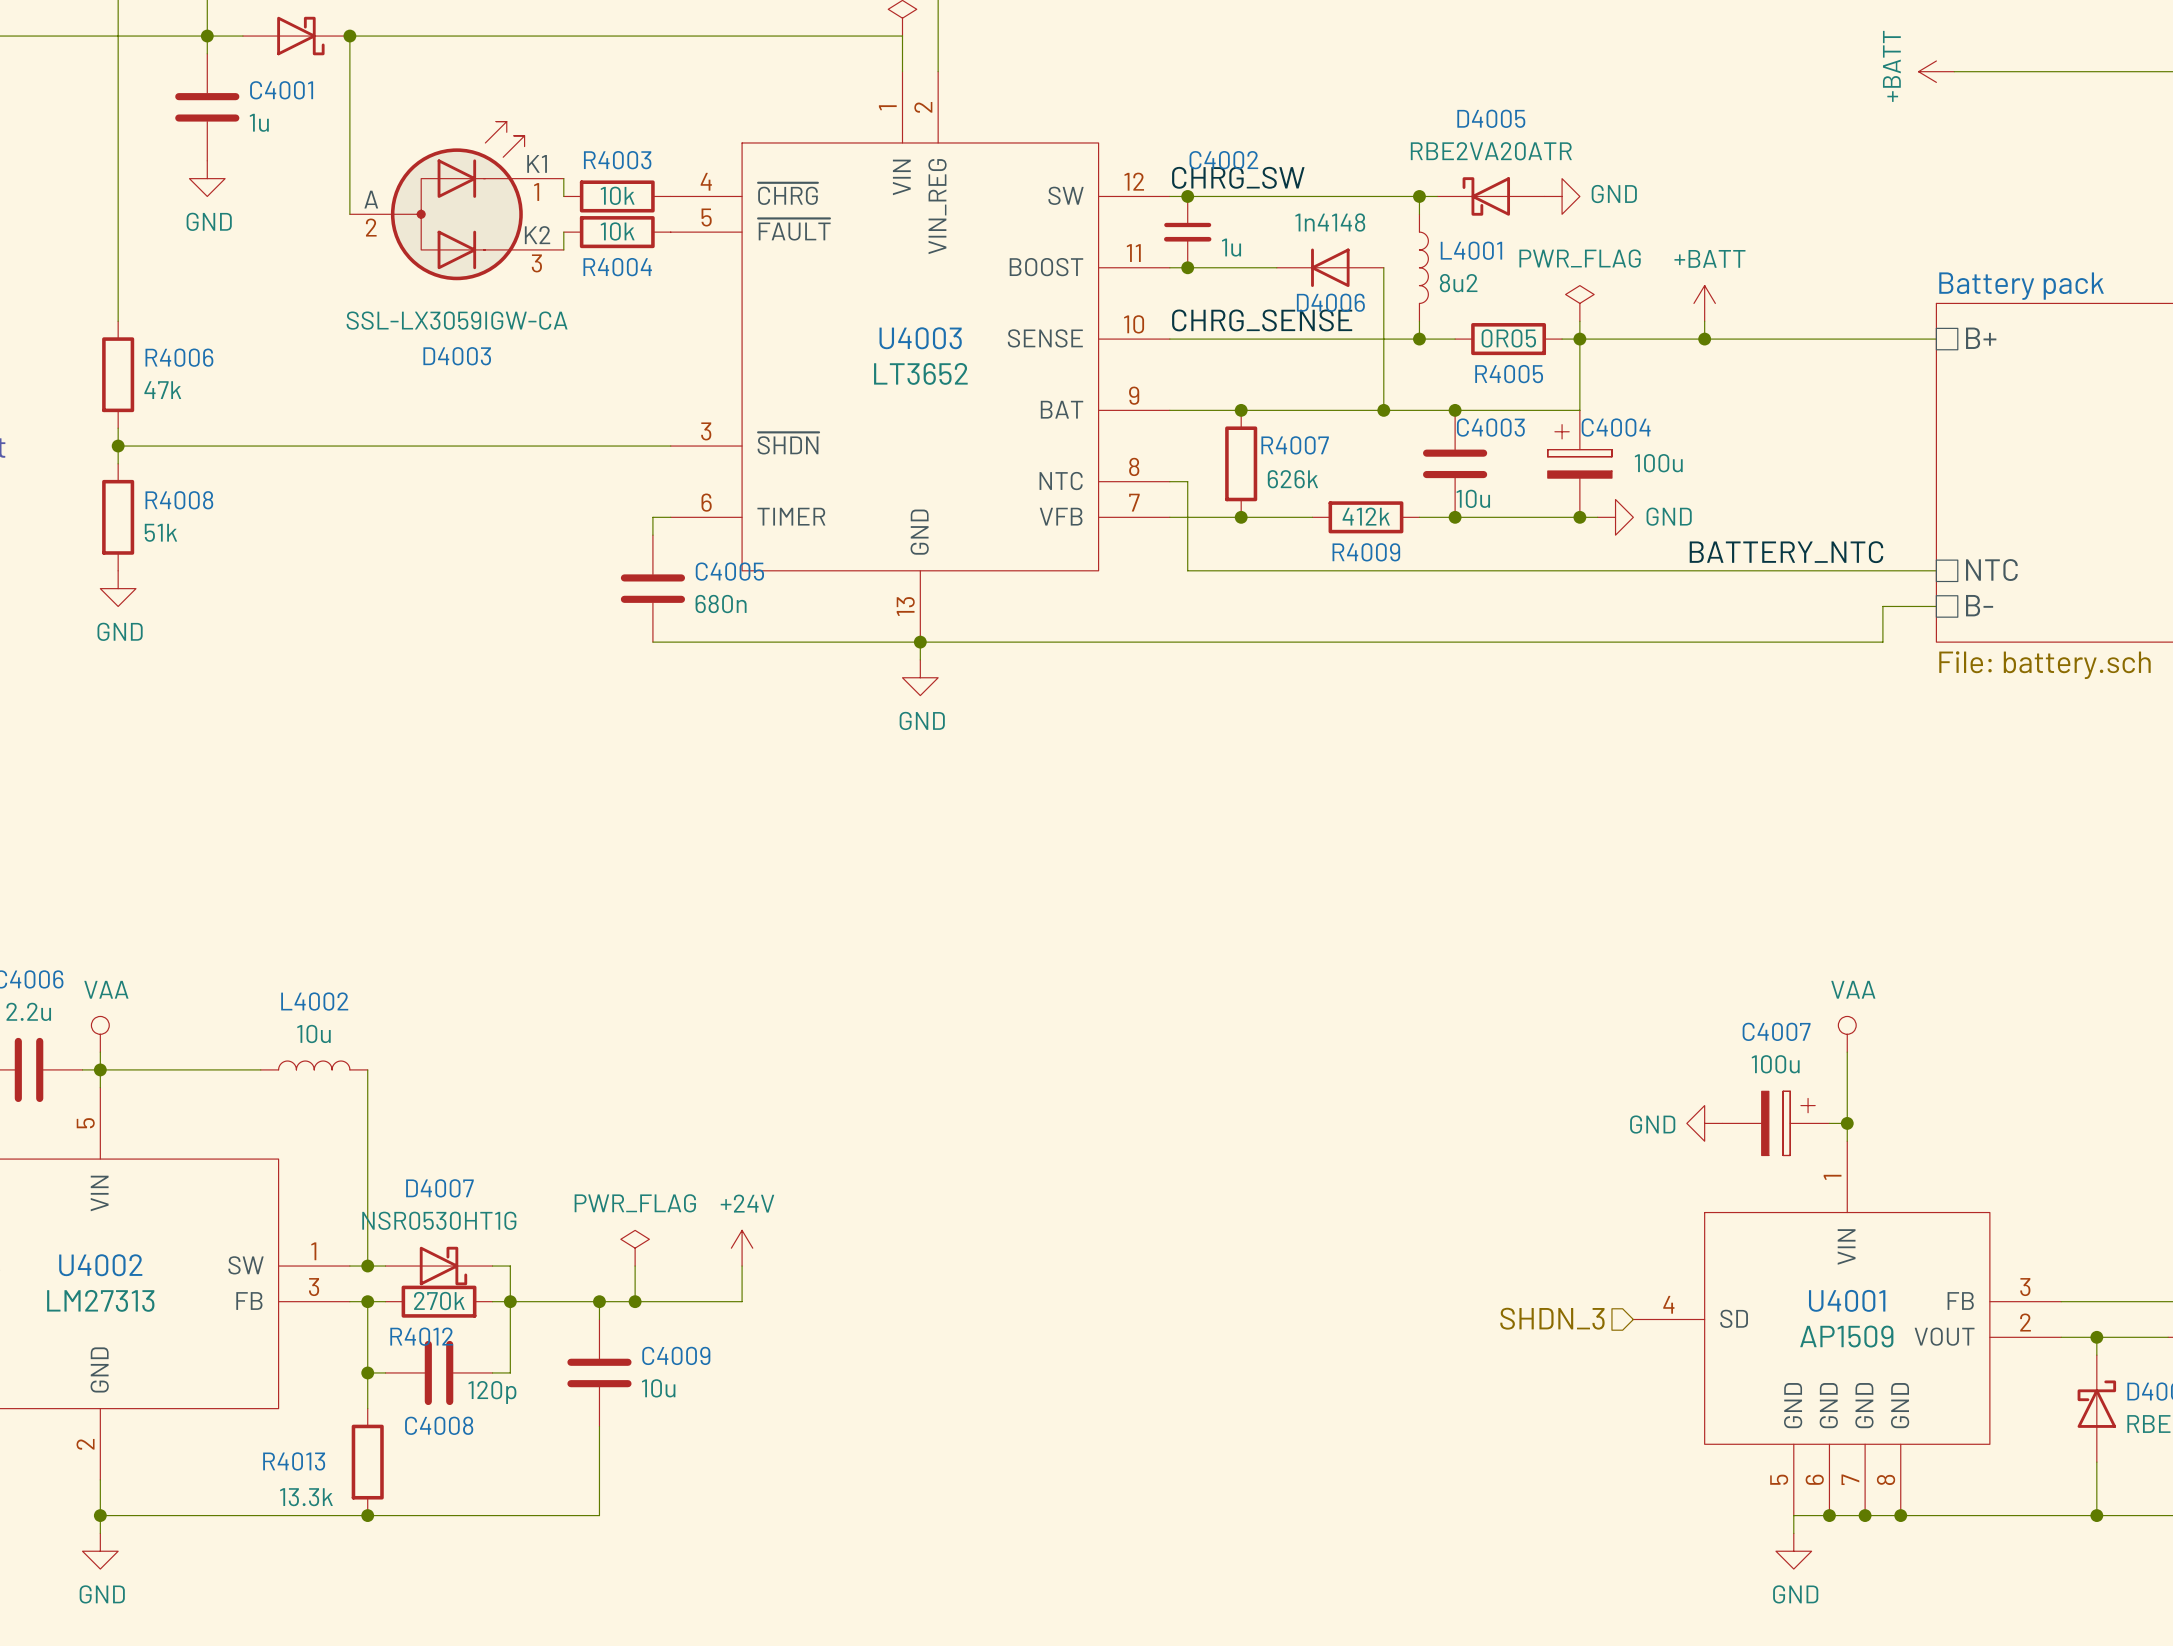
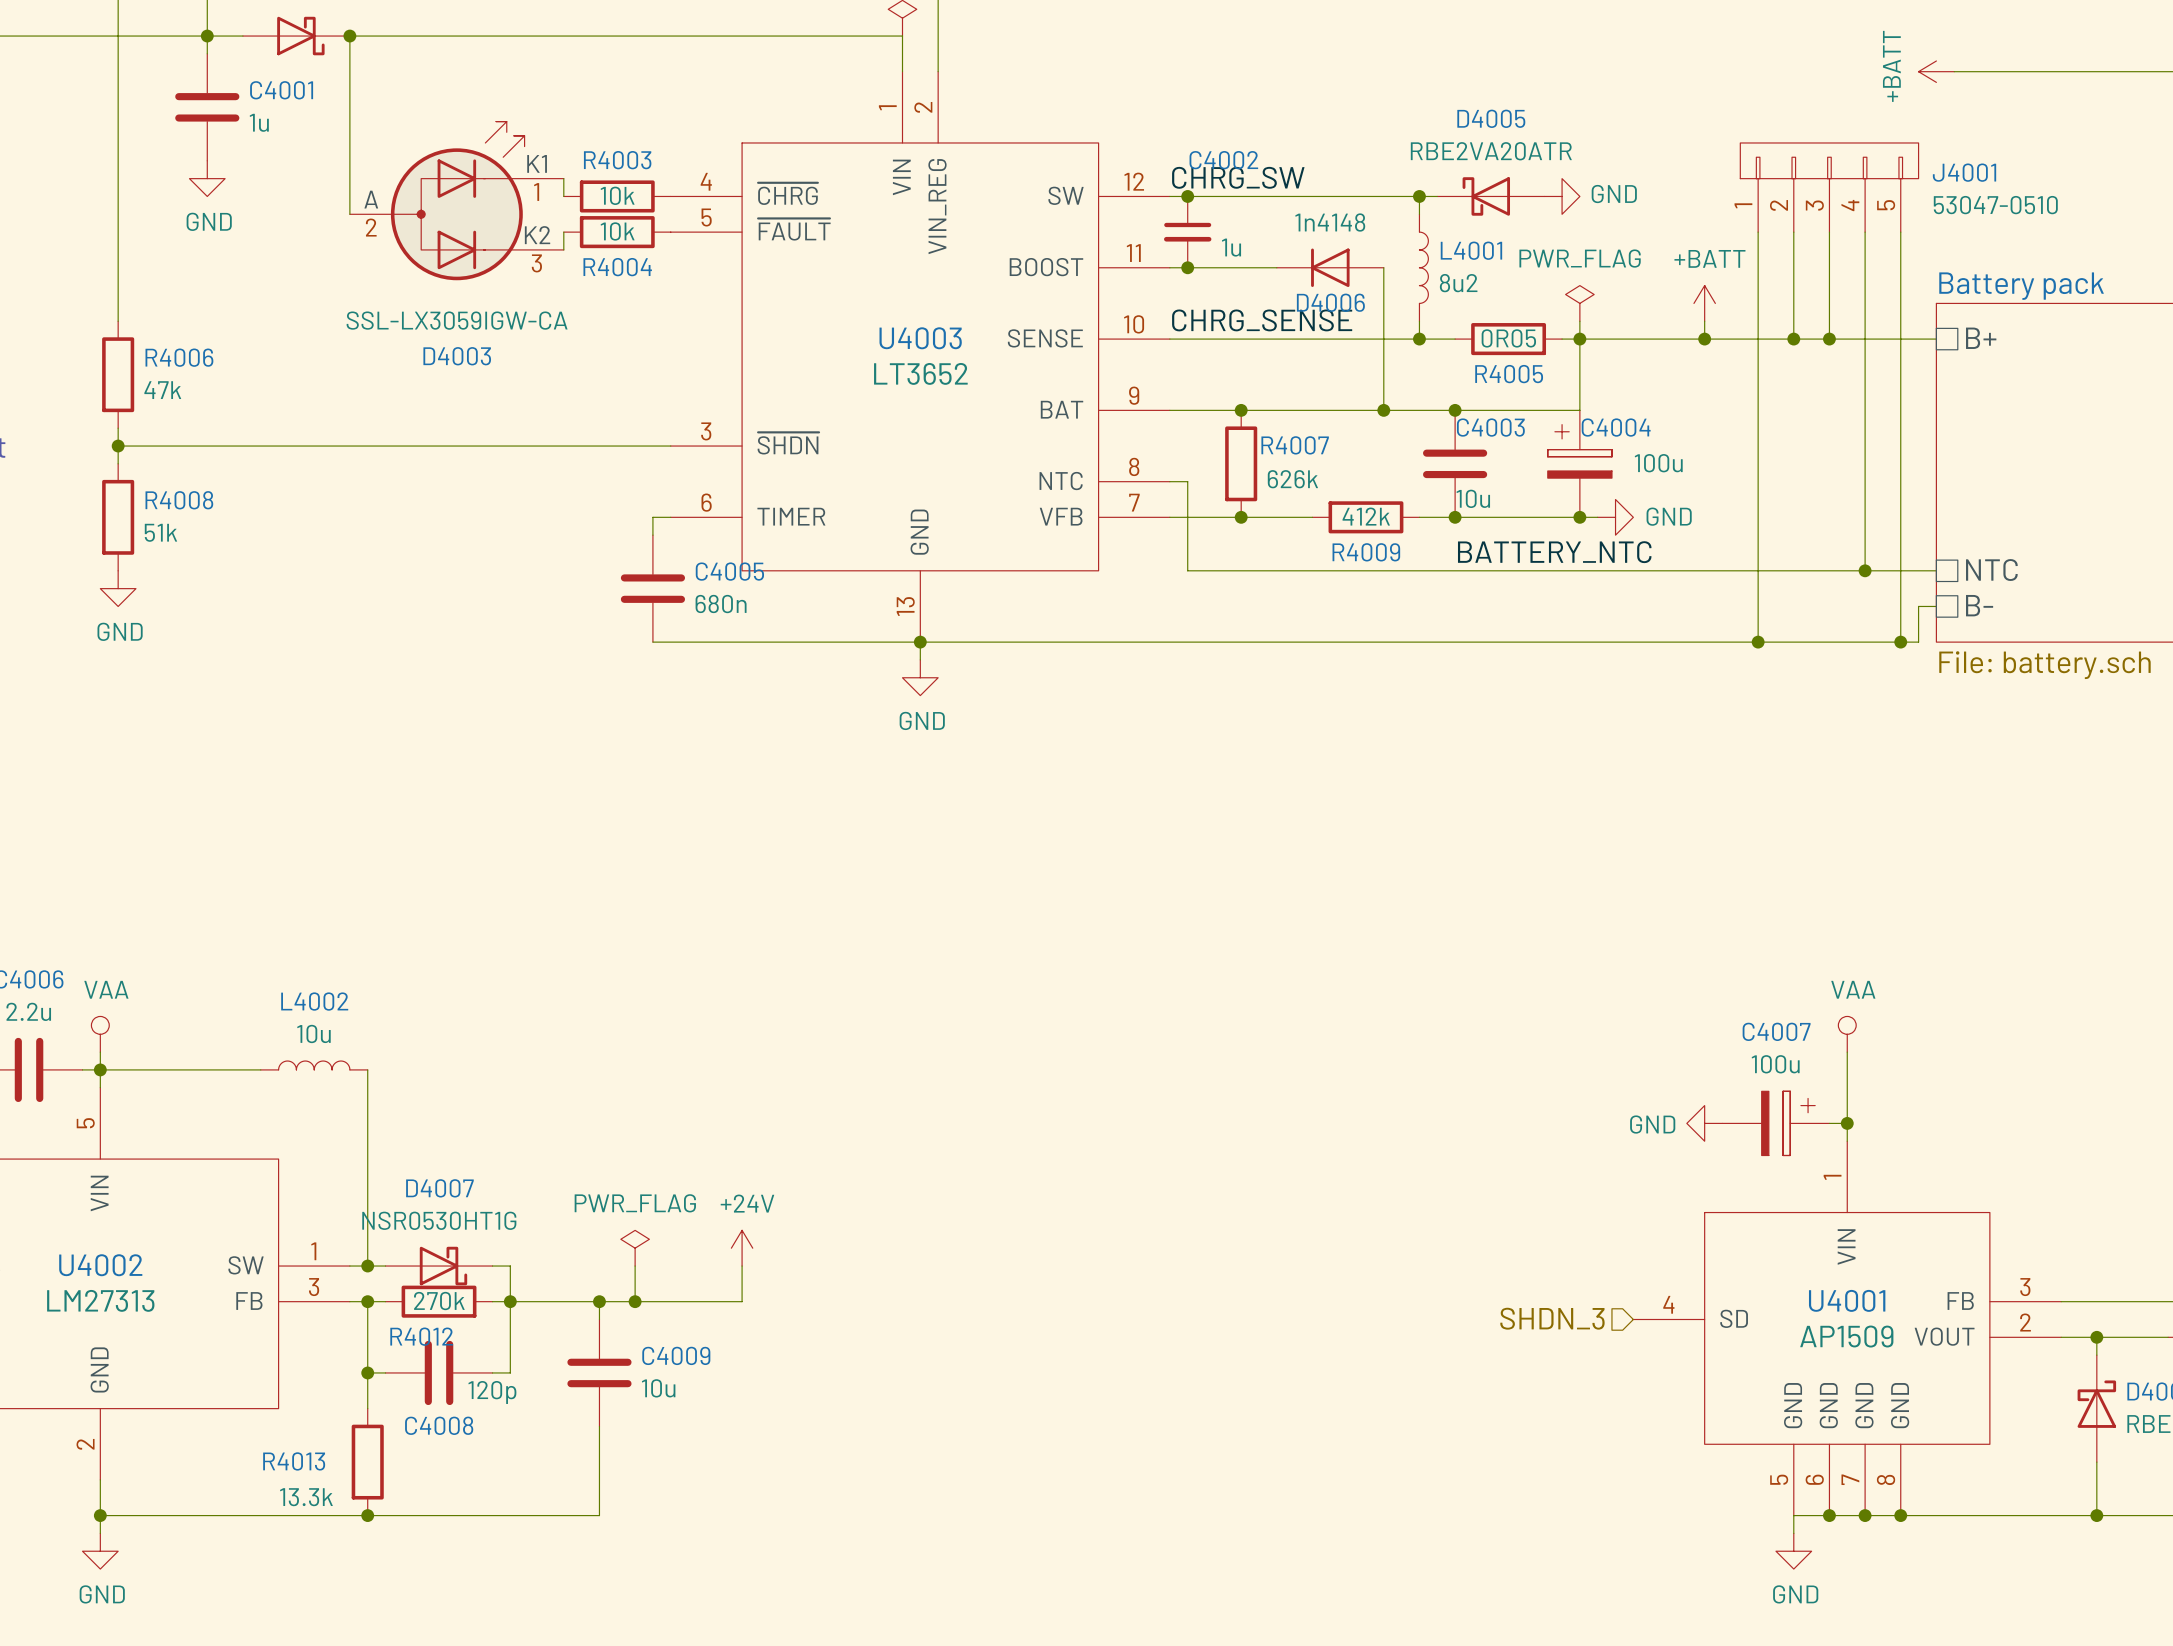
J4001: none -> 53047-0510 (1829, 187)
wire: none -> (1758, 232) (1758, 642)
wire: none -> (1793, 232) (1793, 339)
wire: none -> (1829, 232) (1829, 339)
wire: none -> (1865, 232) (1865, 570)
wire: none -> (1900, 232) (1900, 642)
junction: none -> (1793, 339)
junction: none -> (1829, 339)
label position: BATTERY_NTC (1786, 552) -> BATTERY_NTC (1554, 552)
junction: none -> (1865, 570)
wire: (1918, 606) (1882, 606) (1882, 642) -> (1918, 606) (1918, 642) (1882, 642)
junction: none -> (1758, 642)
junction: none -> (1900, 642)

